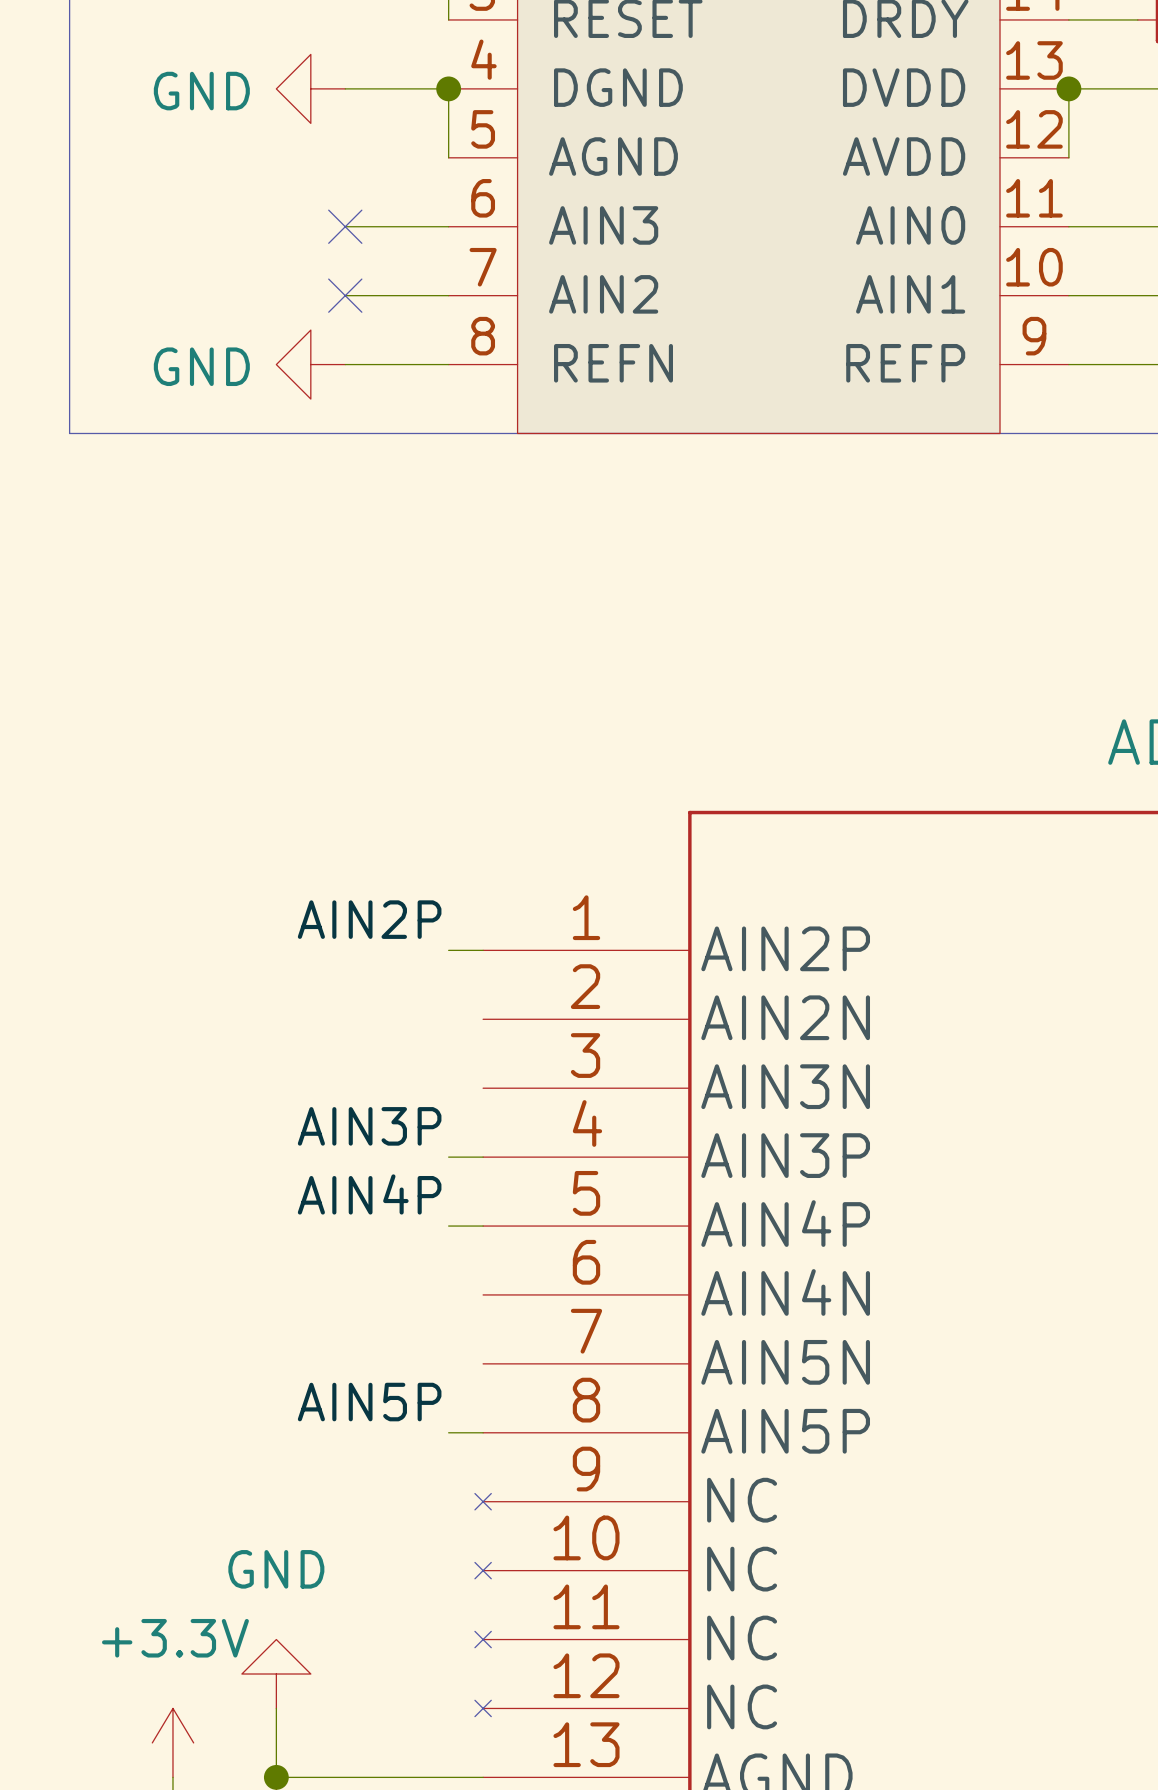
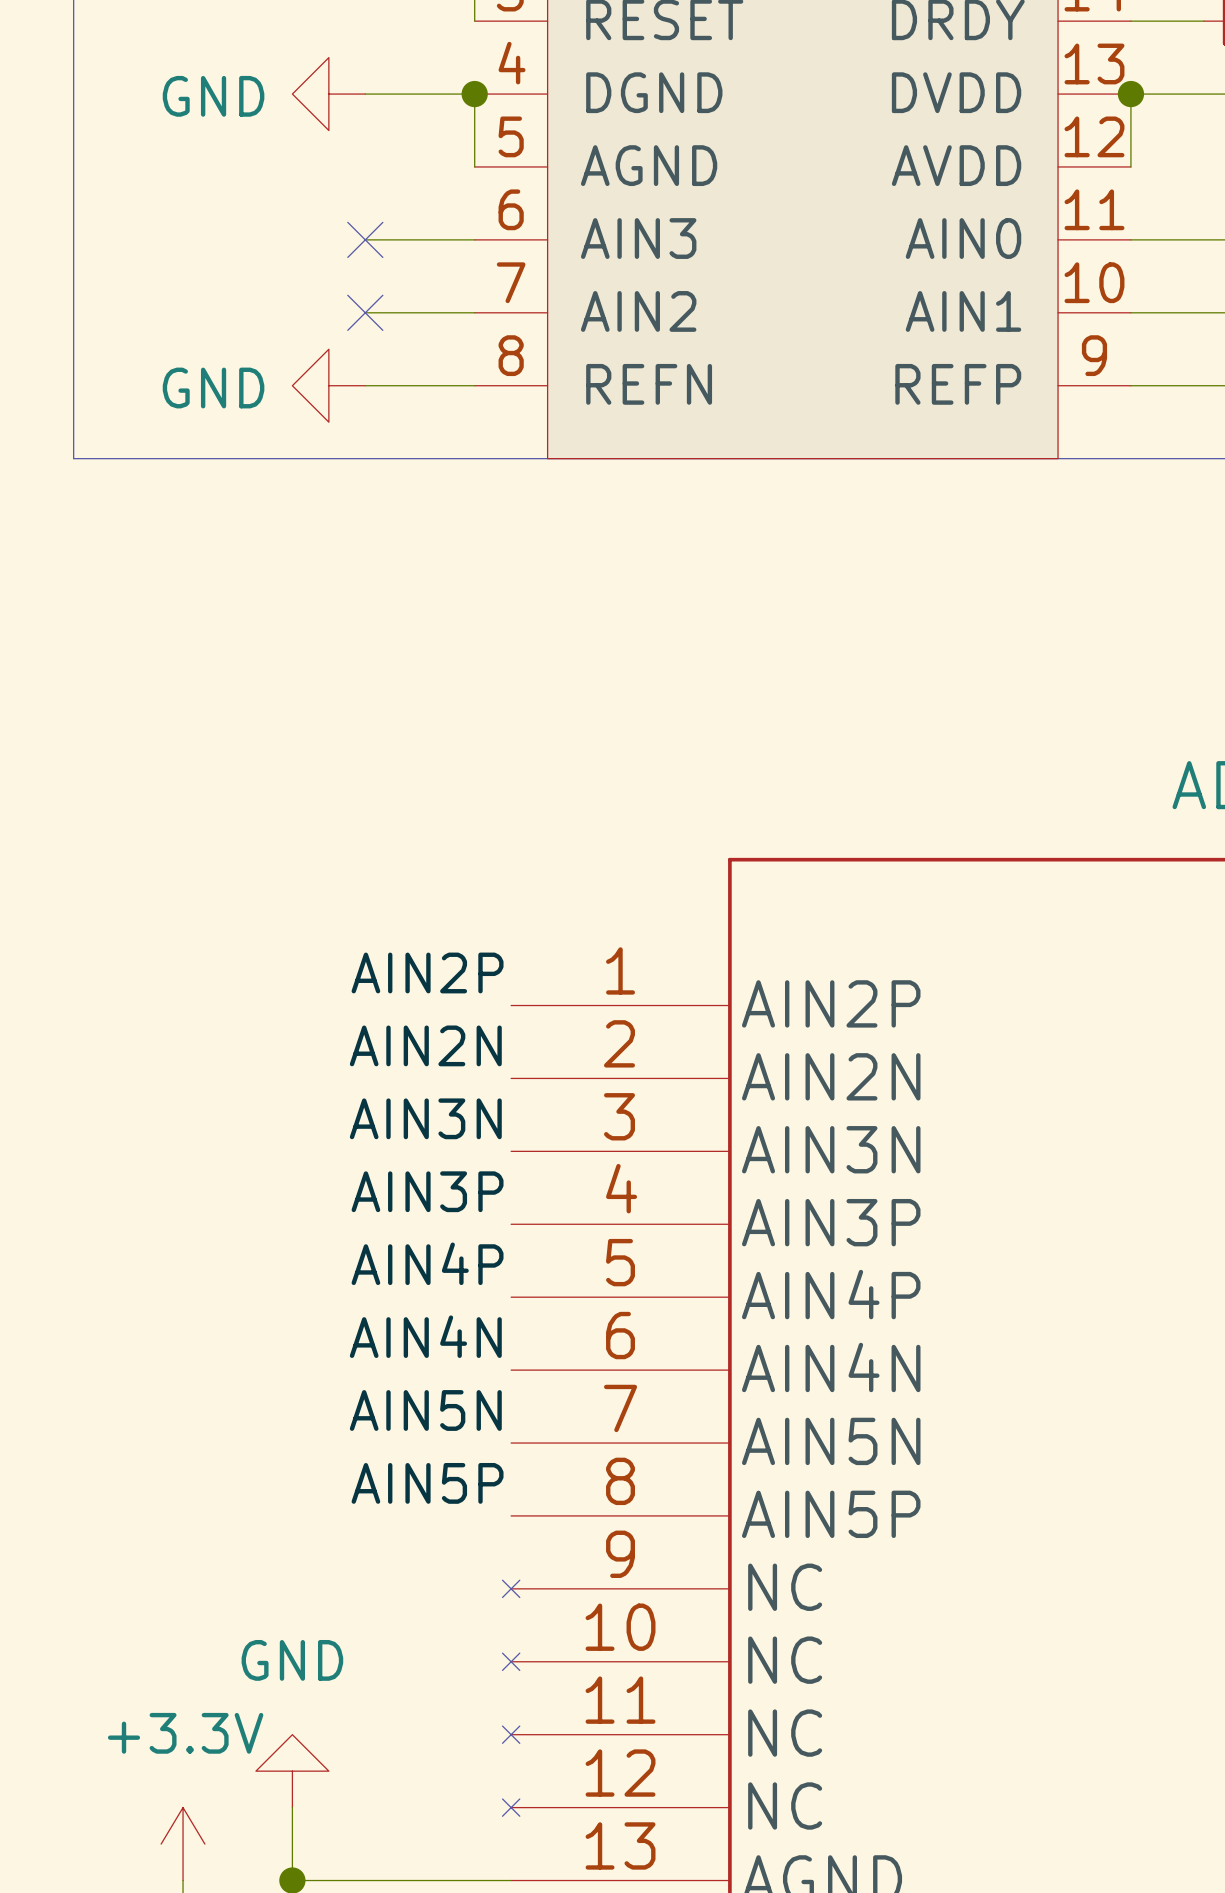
label position: AIN2P (369, 919) -> AIN2P (427, 972)
wire: (448, 950) (483, 950) -> none
label: none -> AIN2N (425, 1045)
label: none -> AIN3N (425, 1118)
label position: AIN3P (369, 1126) -> AIN3P (427, 1191)
wire: (448, 1157) (483, 1157) -> none
label position: AIN4P (369, 1194) -> AIN4P (427, 1263)
wire: (448, 1226) (483, 1226) -> none
label: none -> AIN4N (425, 1336)
label: none -> AIN5N (425, 1410)
label position: AIN5P (369, 1402) -> AIN5P (427, 1483)
wire: (448, 1432) (483, 1432) -> none

